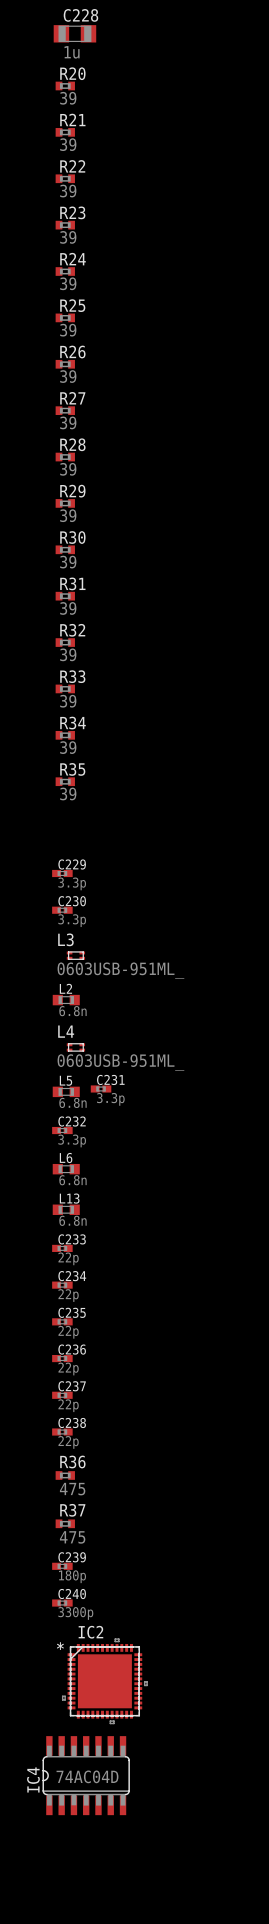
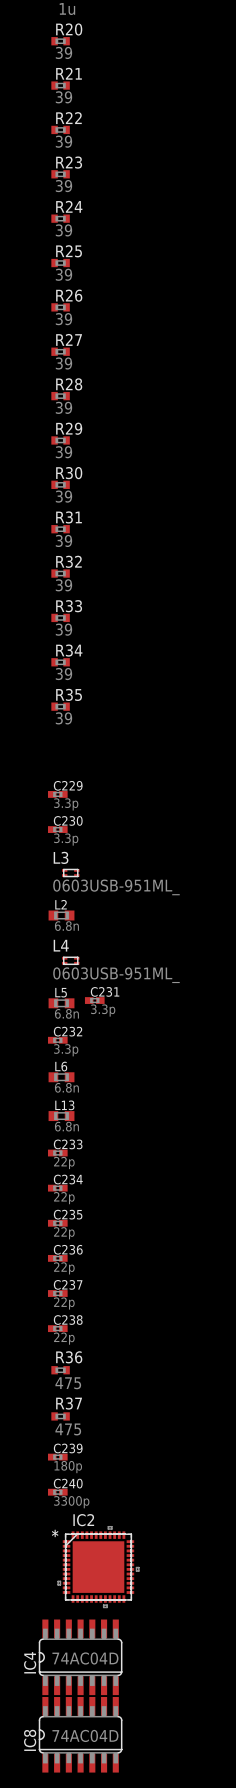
IC8: none -> 74AC04D (80, 1734)

